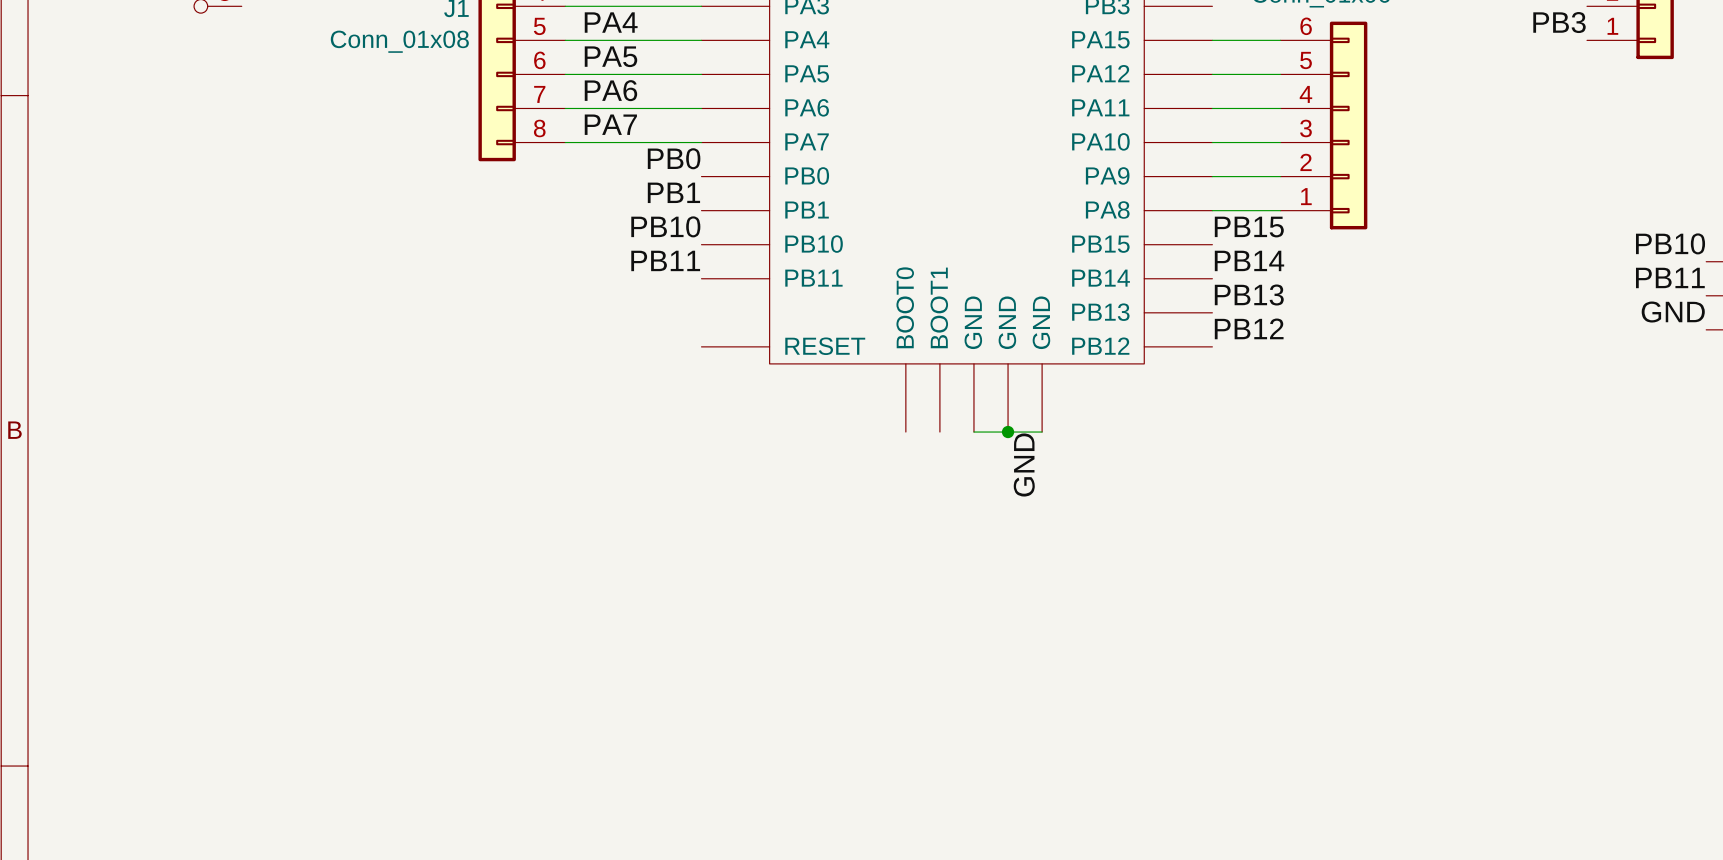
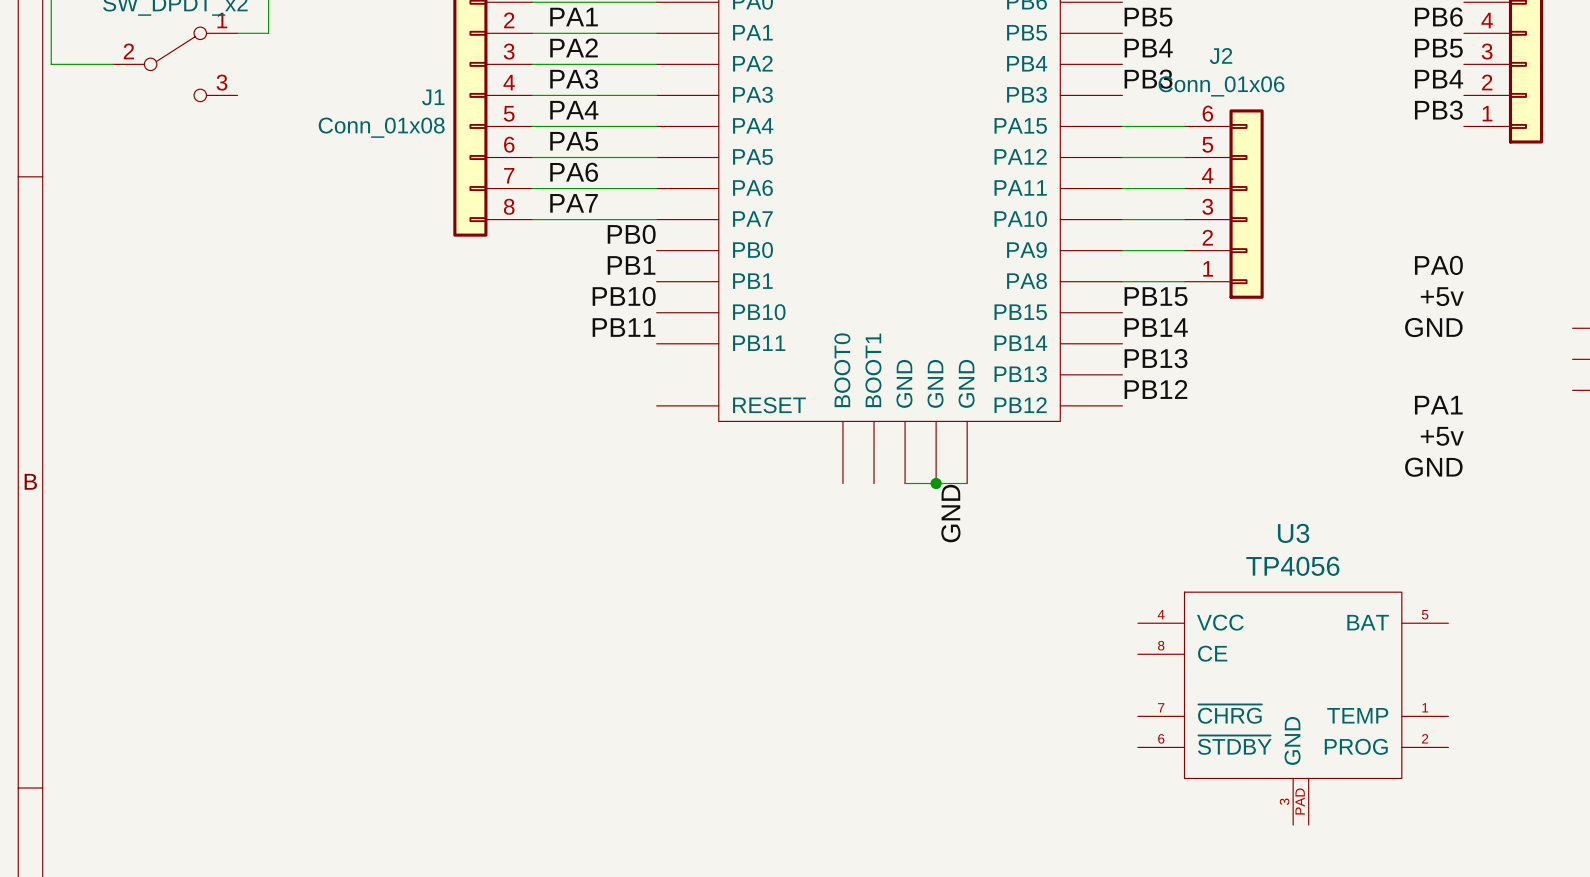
label: none -> PA0 (1438, 265)
label: none -> +5v (1442, 296)
label: PB10 (1670, 243) -> none
label: none -> GND (1433, 327)
label: PB11 (1670, 277) -> none
label: GND (1673, 312) -> none
label: none -> PA1 (1438, 405)
label: none -> +5v (1442, 436)
label: none -> GND (1433, 467)
U3: none -> TP4056 (1293, 708)

